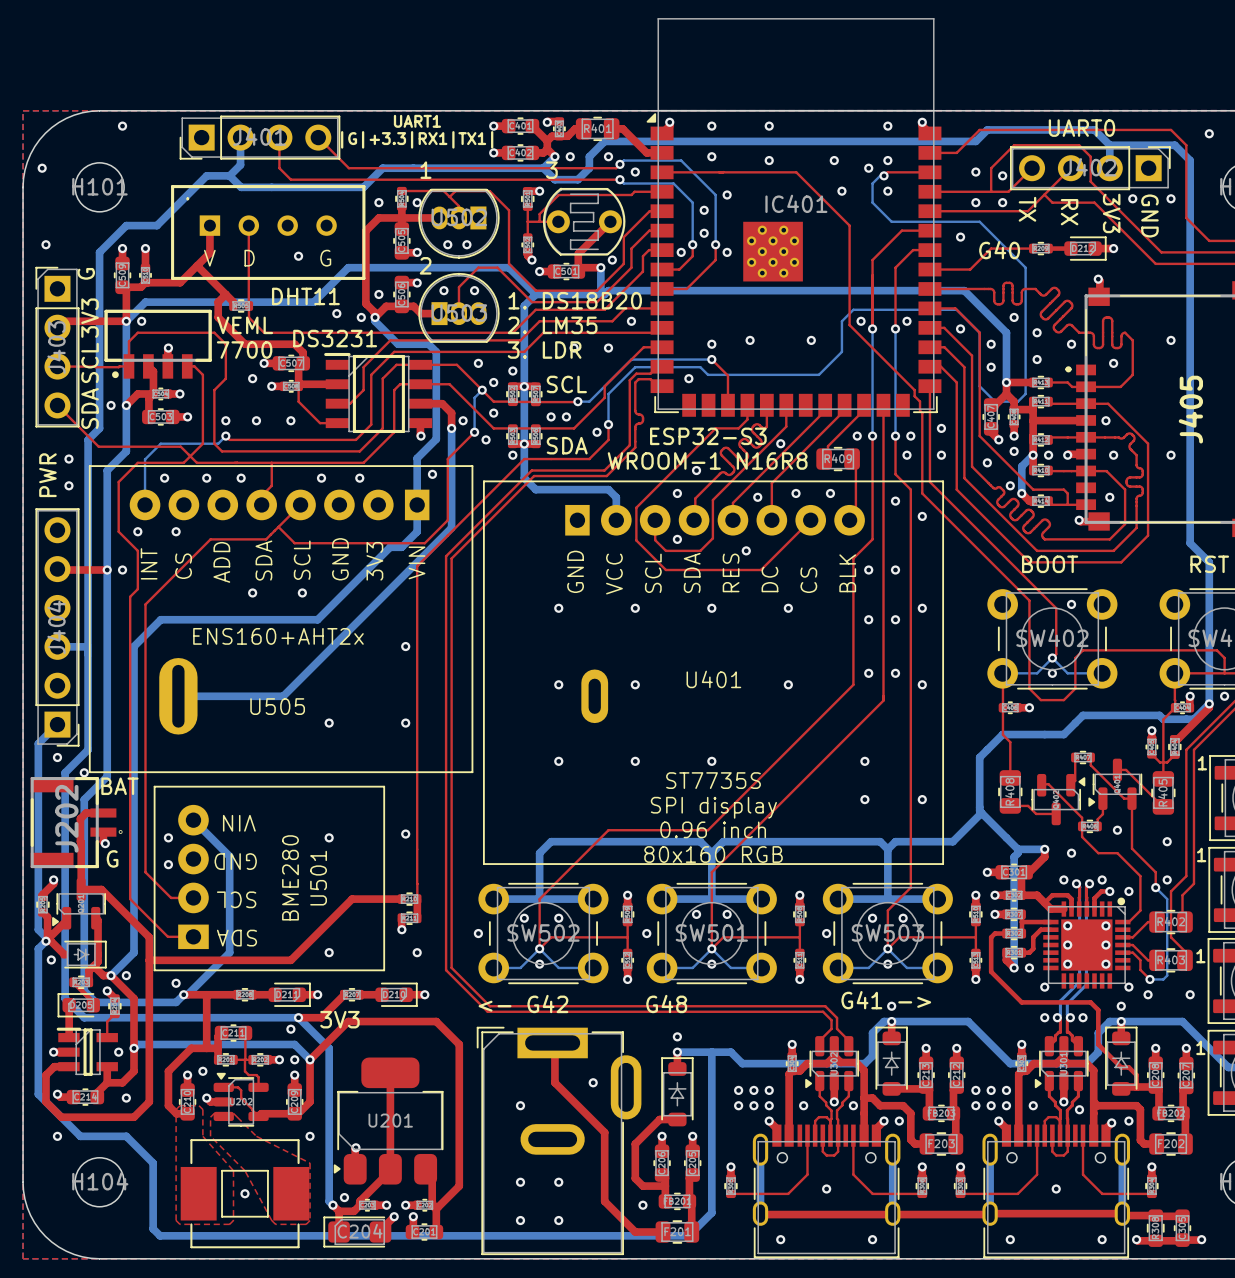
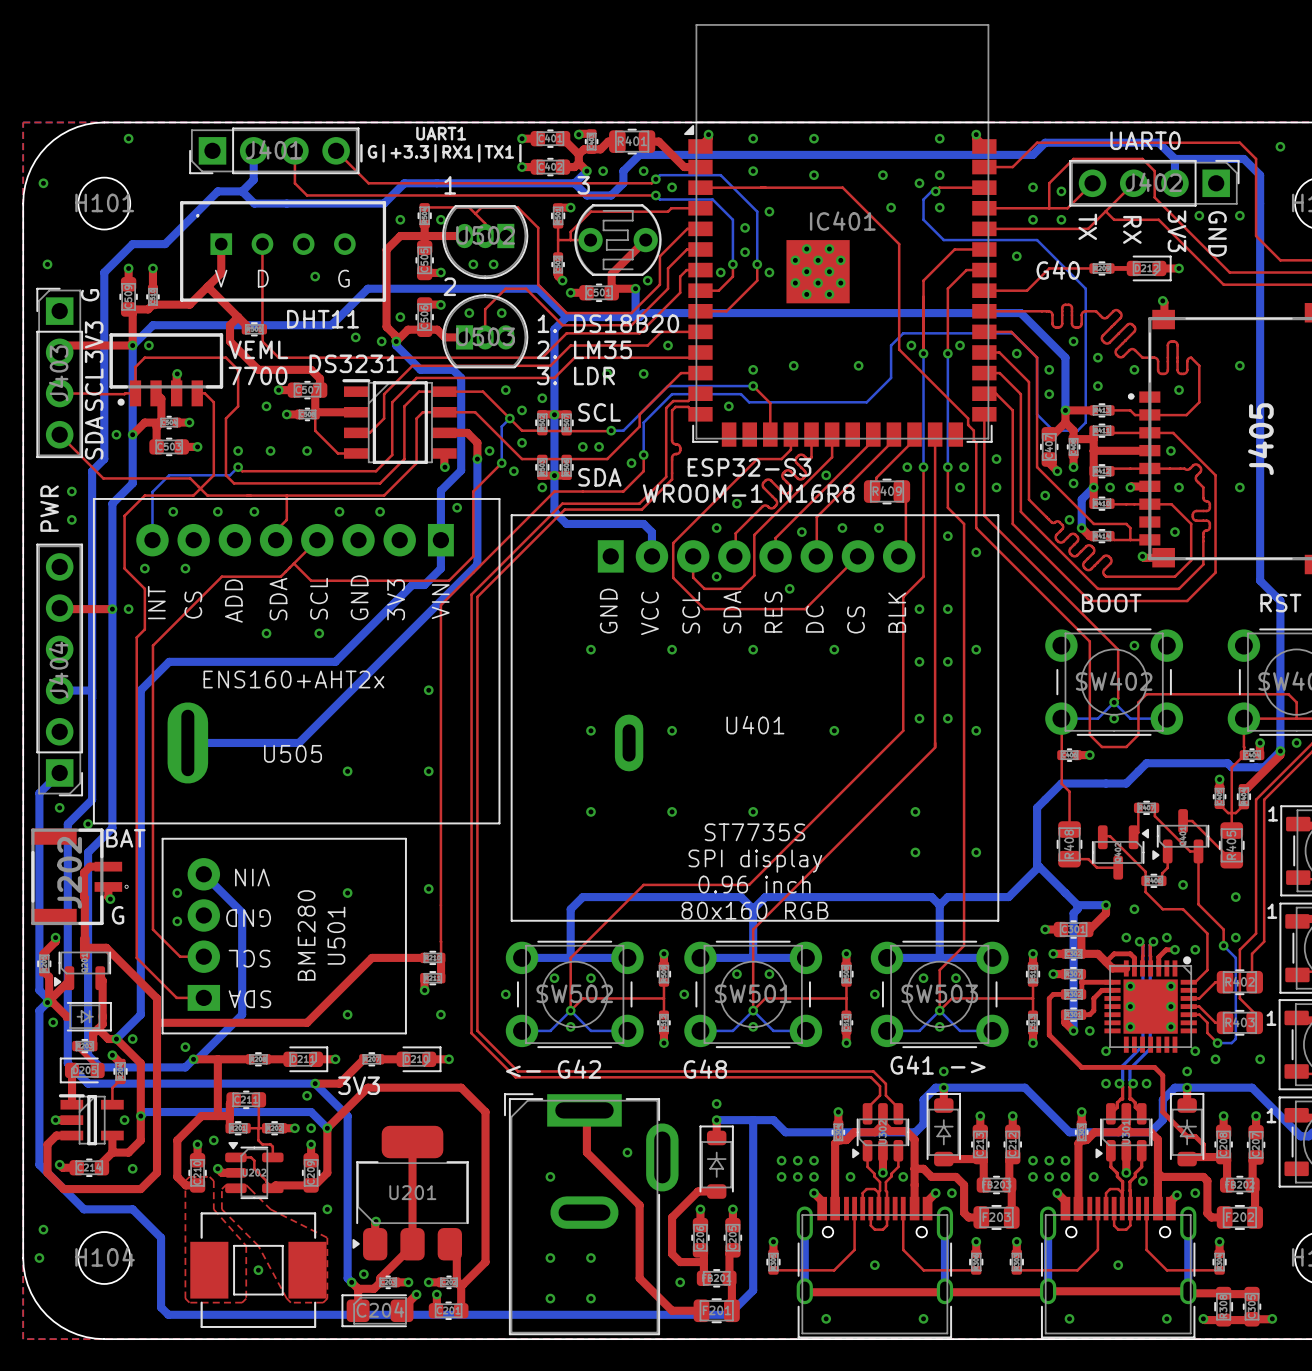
via position: (57, 1136) -> (43, 1229)
via: none -> (39, 1258)

